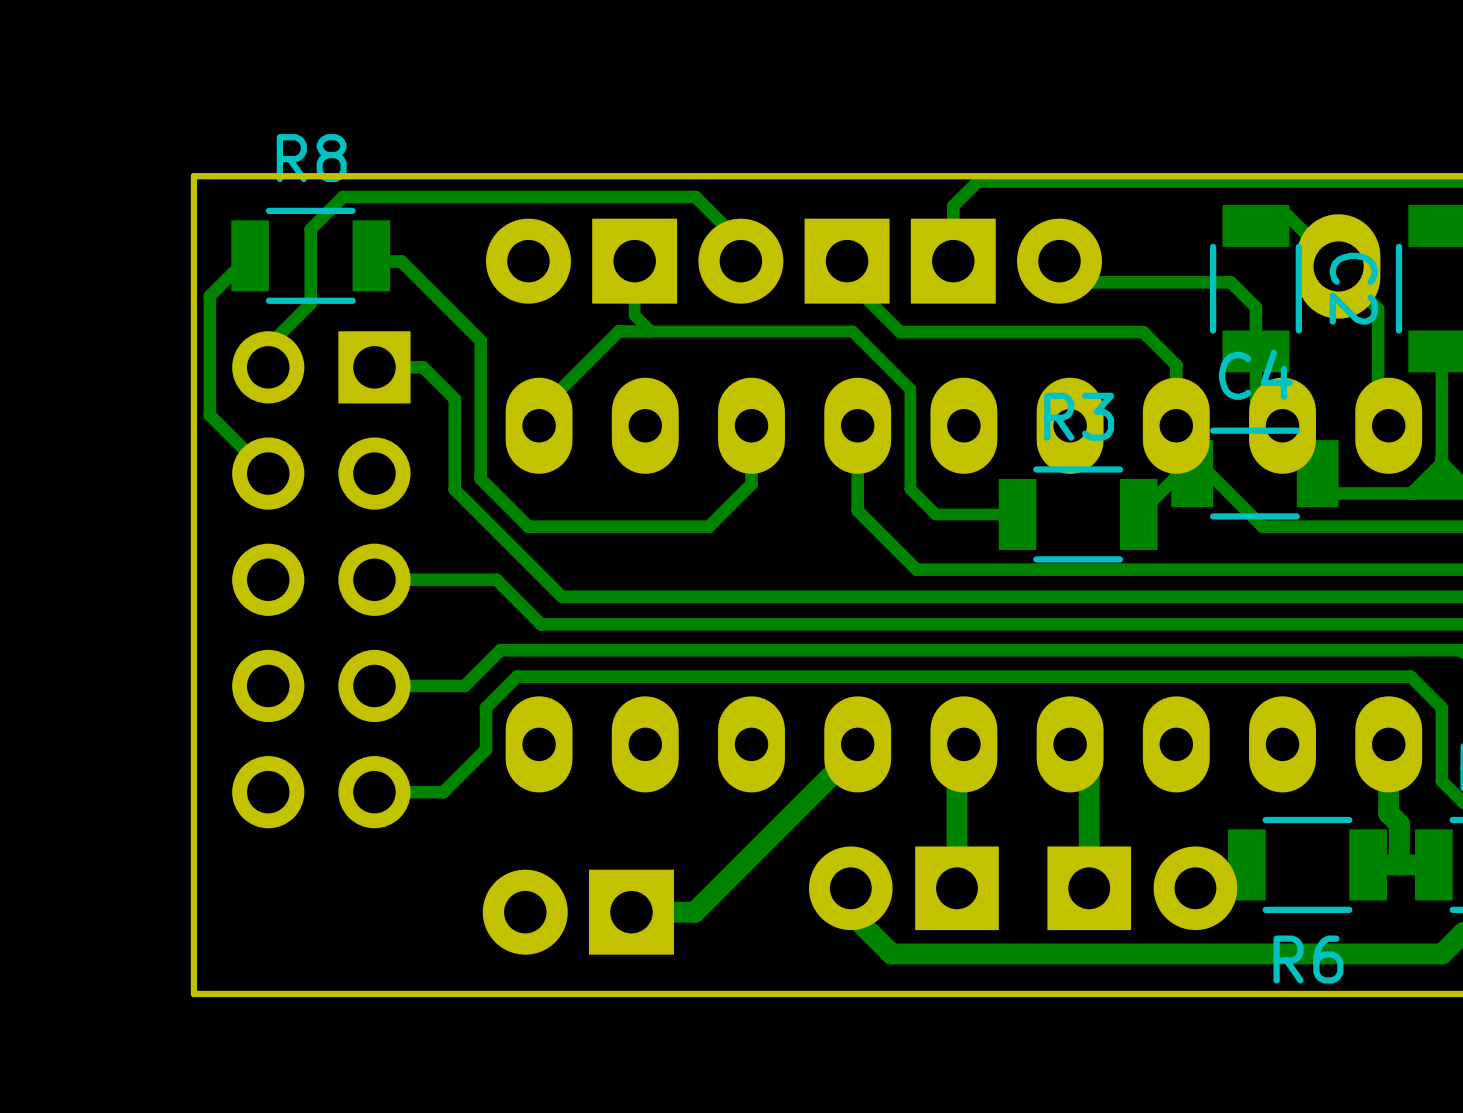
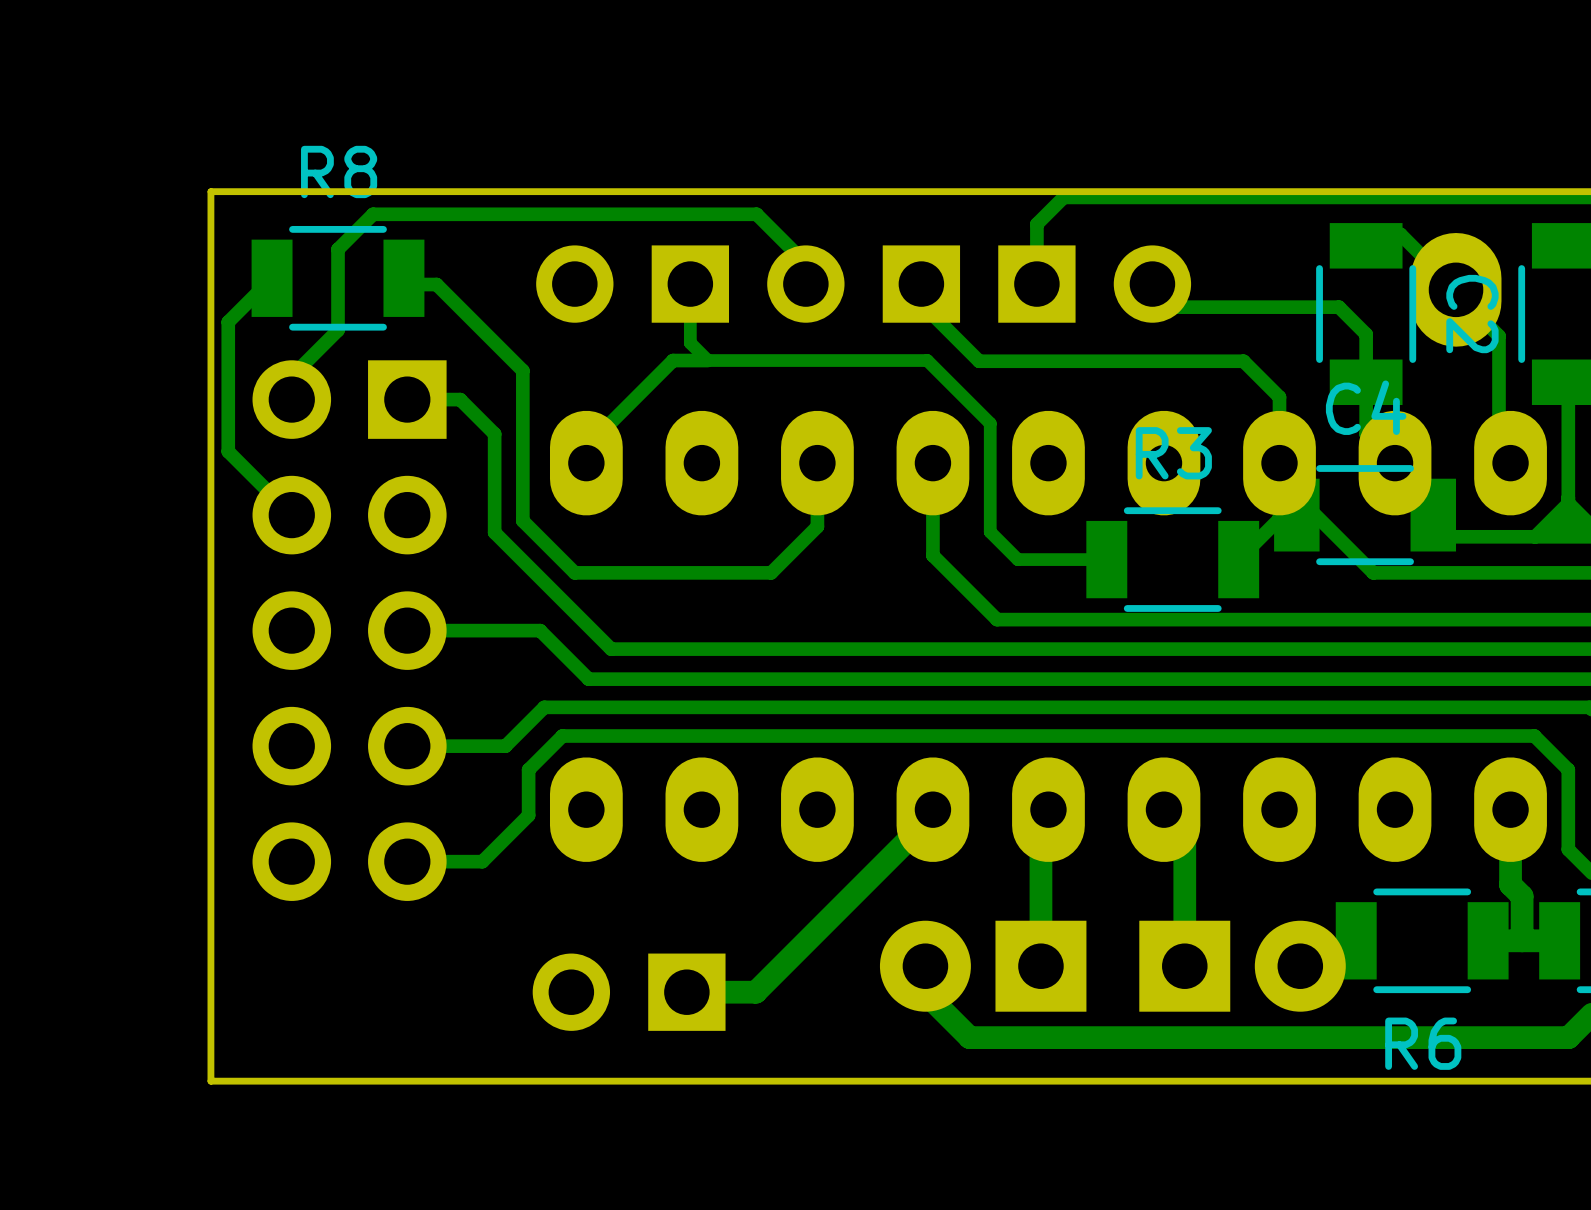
part footprint: [485, 218, 678, 304] -> [536, 245, 730, 323]
part footprint: [698, 218, 890, 304] -> [767, 245, 961, 323]
part footprint: [910, 218, 1102, 304] -> [998, 245, 1192, 323]
part footprint: [482, 869, 674, 955] -> [532, 953, 726, 1031]

